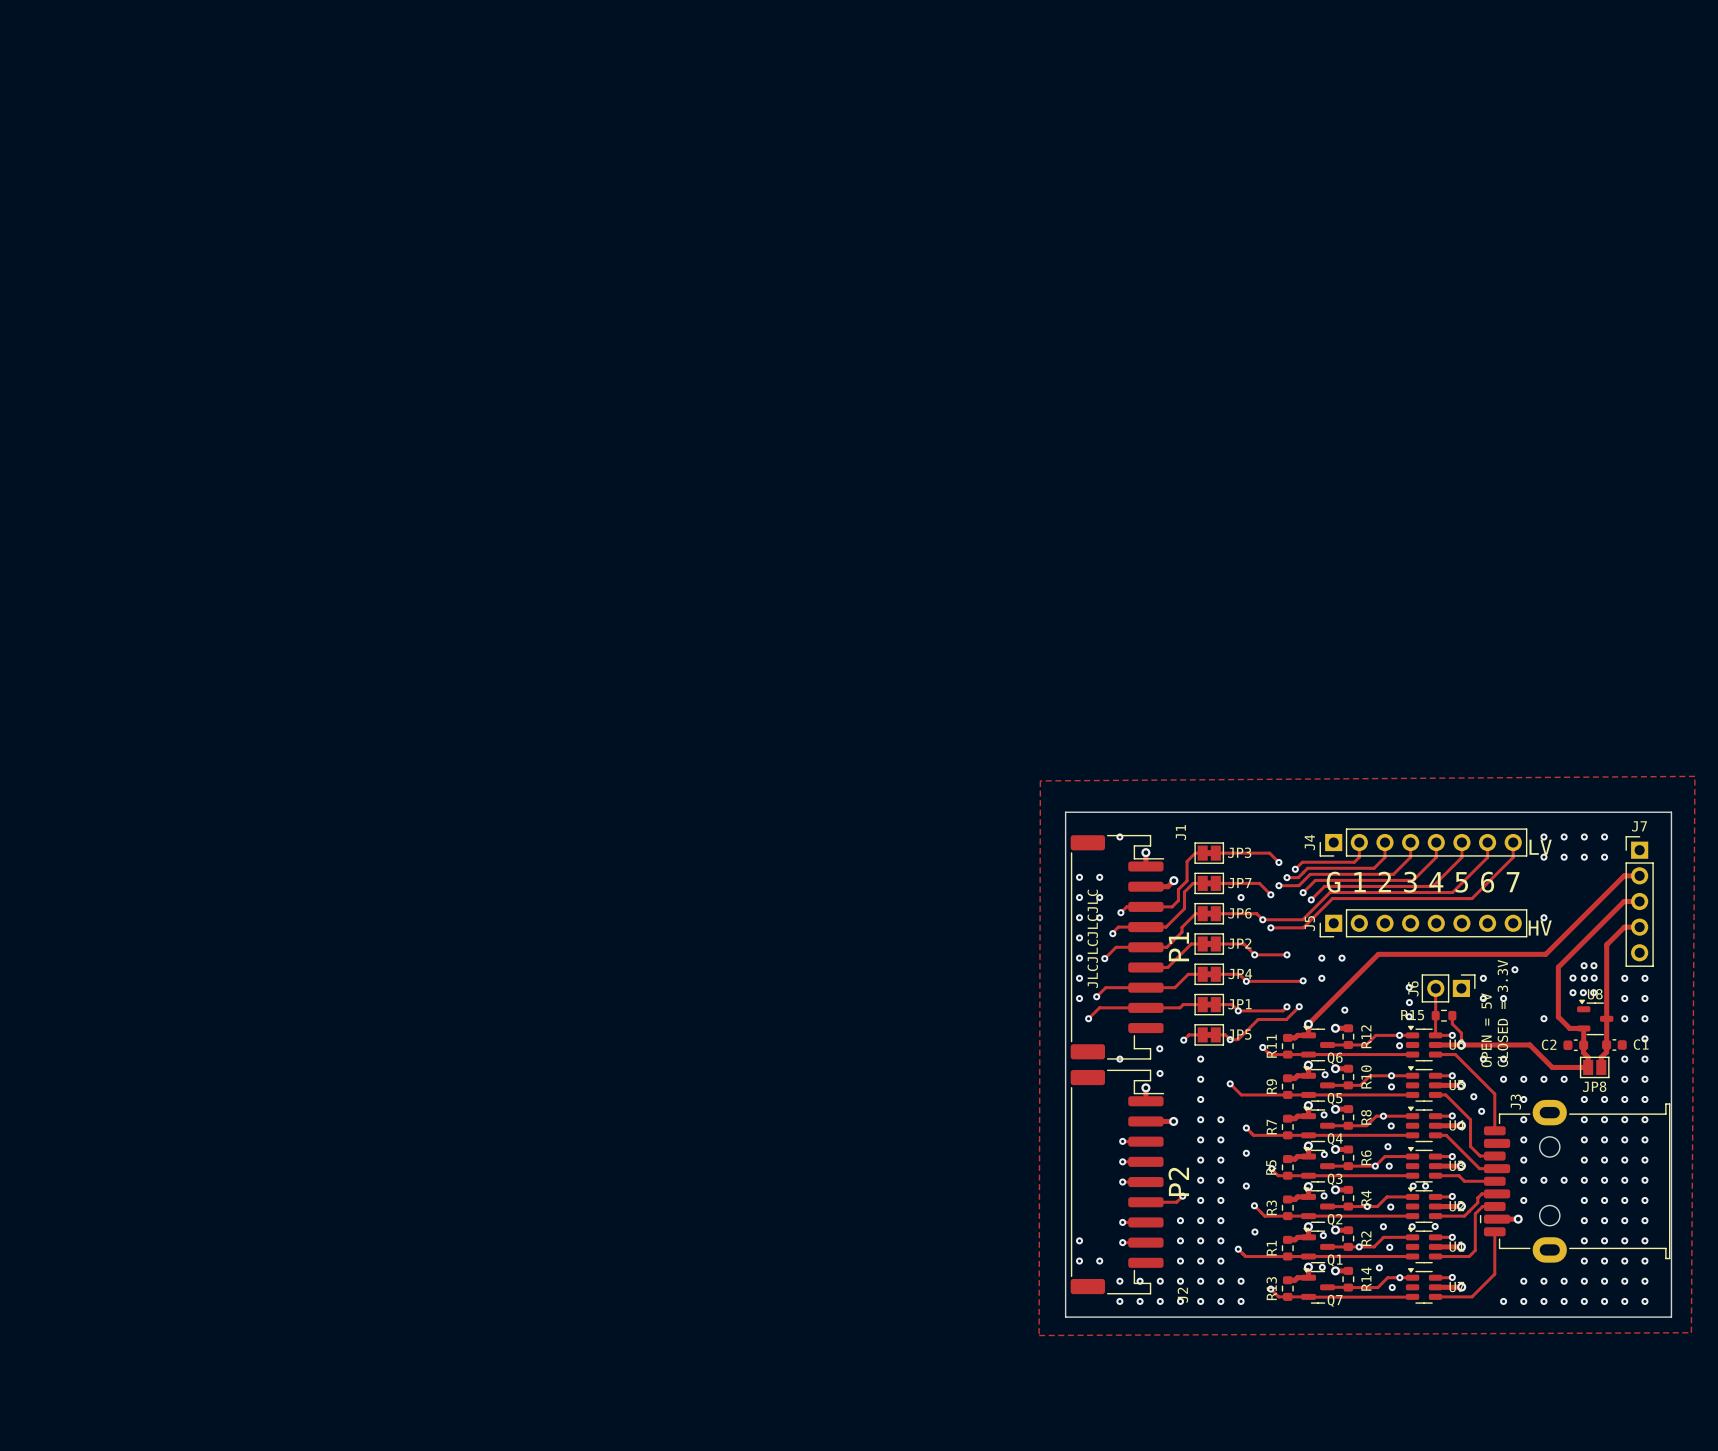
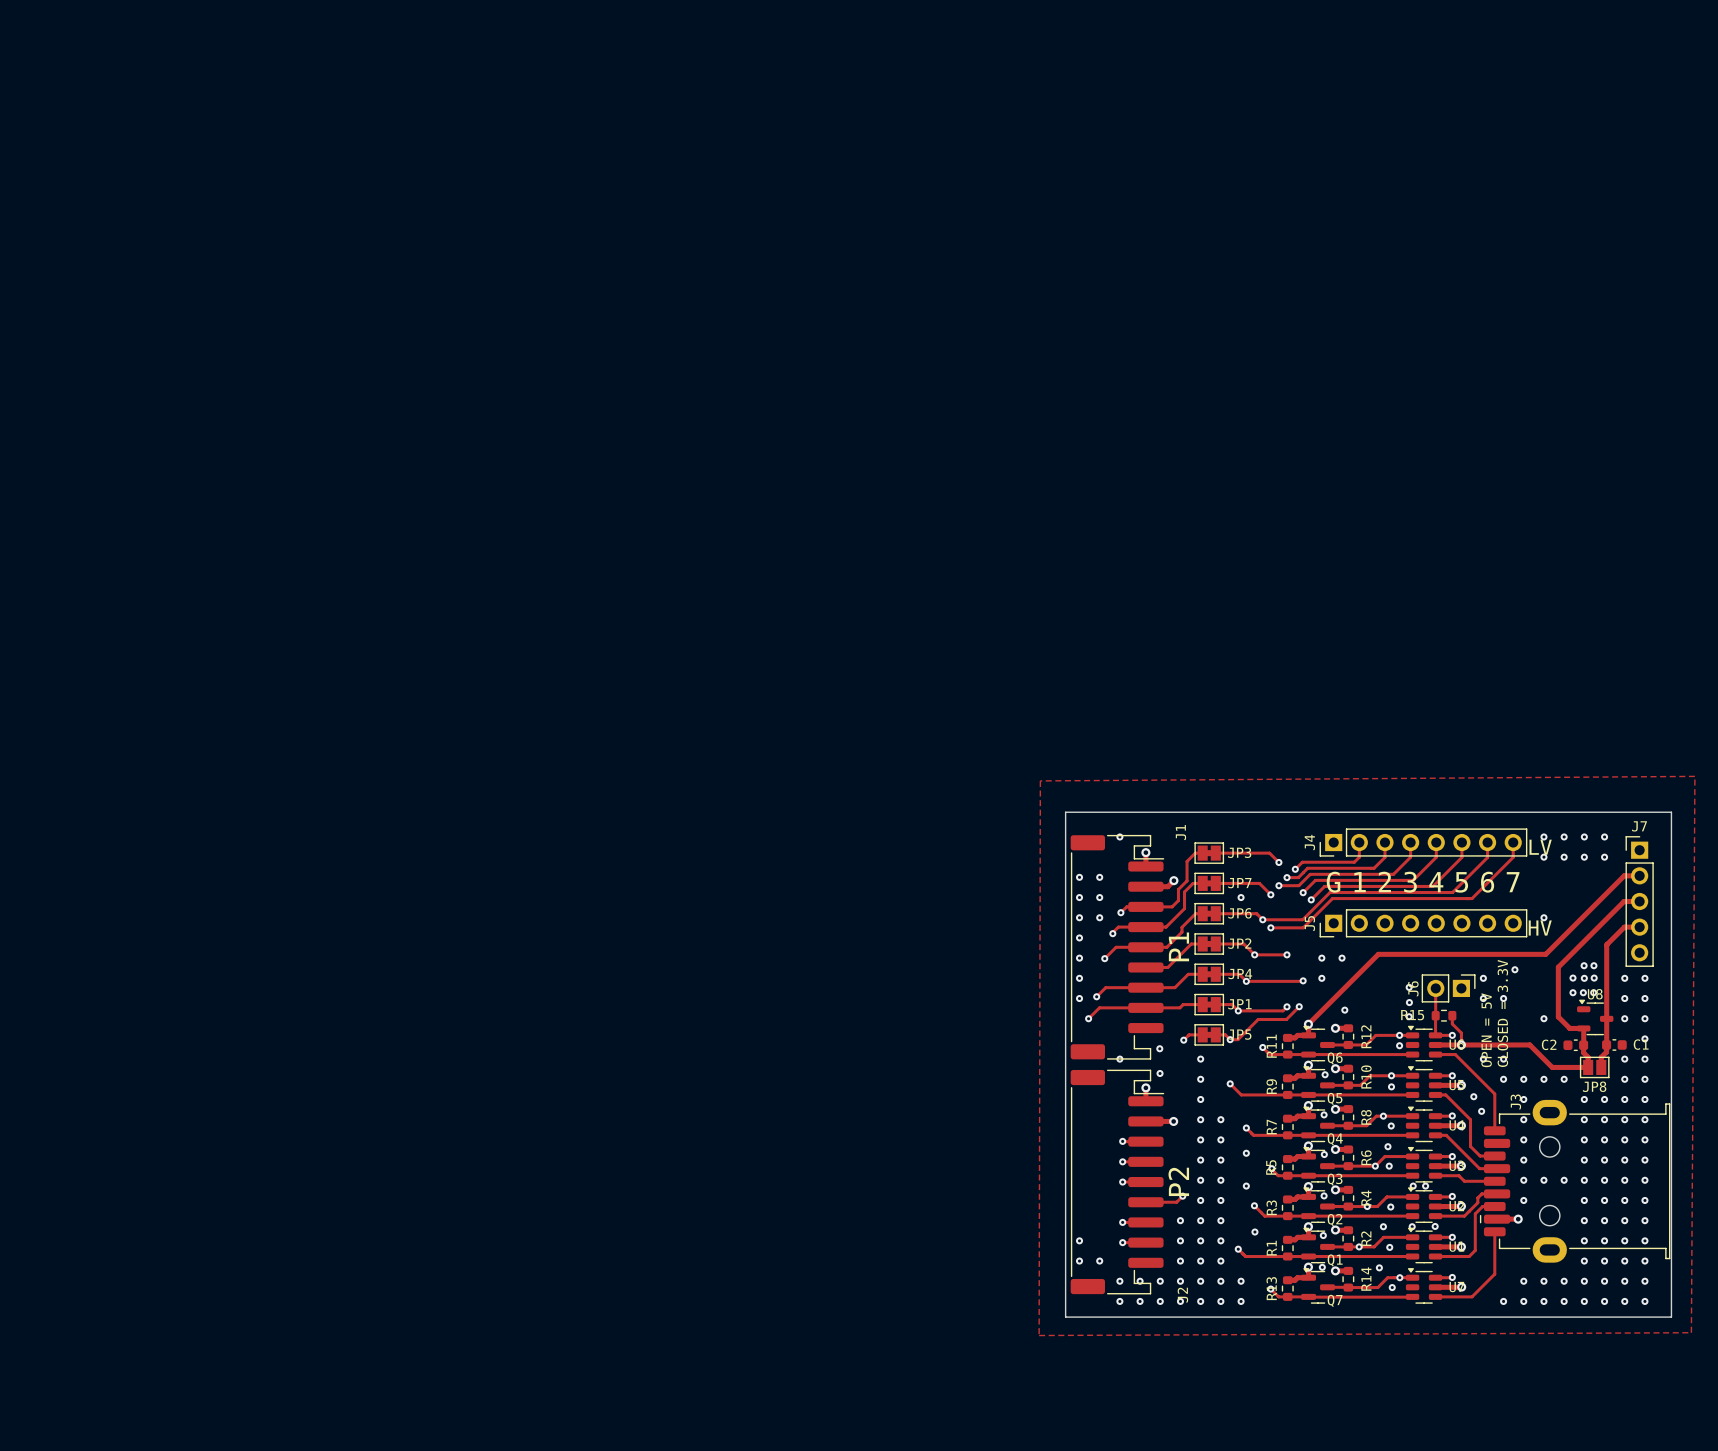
text: JLCJLCJLCJLC (1092, 938) -> none

